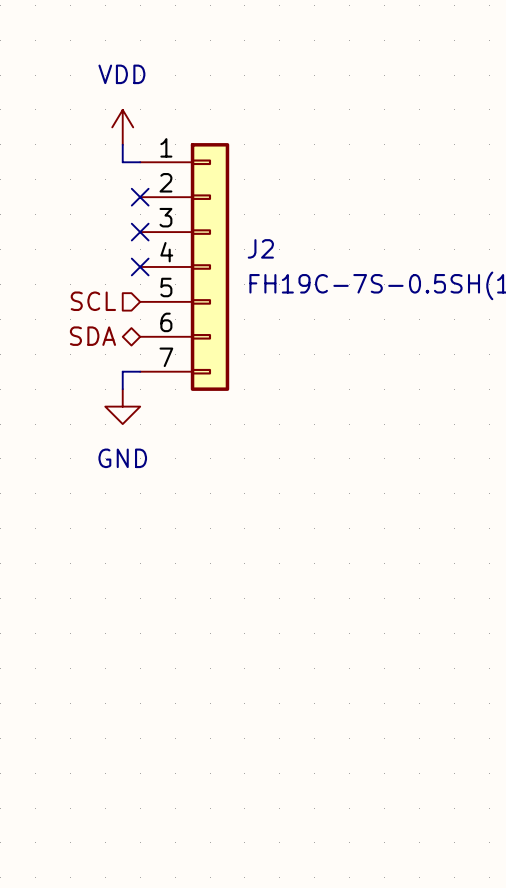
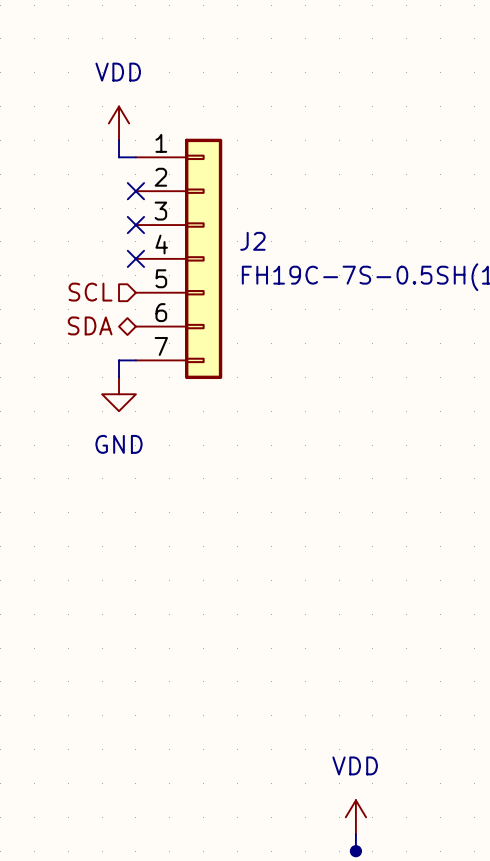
power symbol: none -> VDD (355, 817)
wire: none -> (355, 834) (355, 851)
junction: none -> (355, 851)

